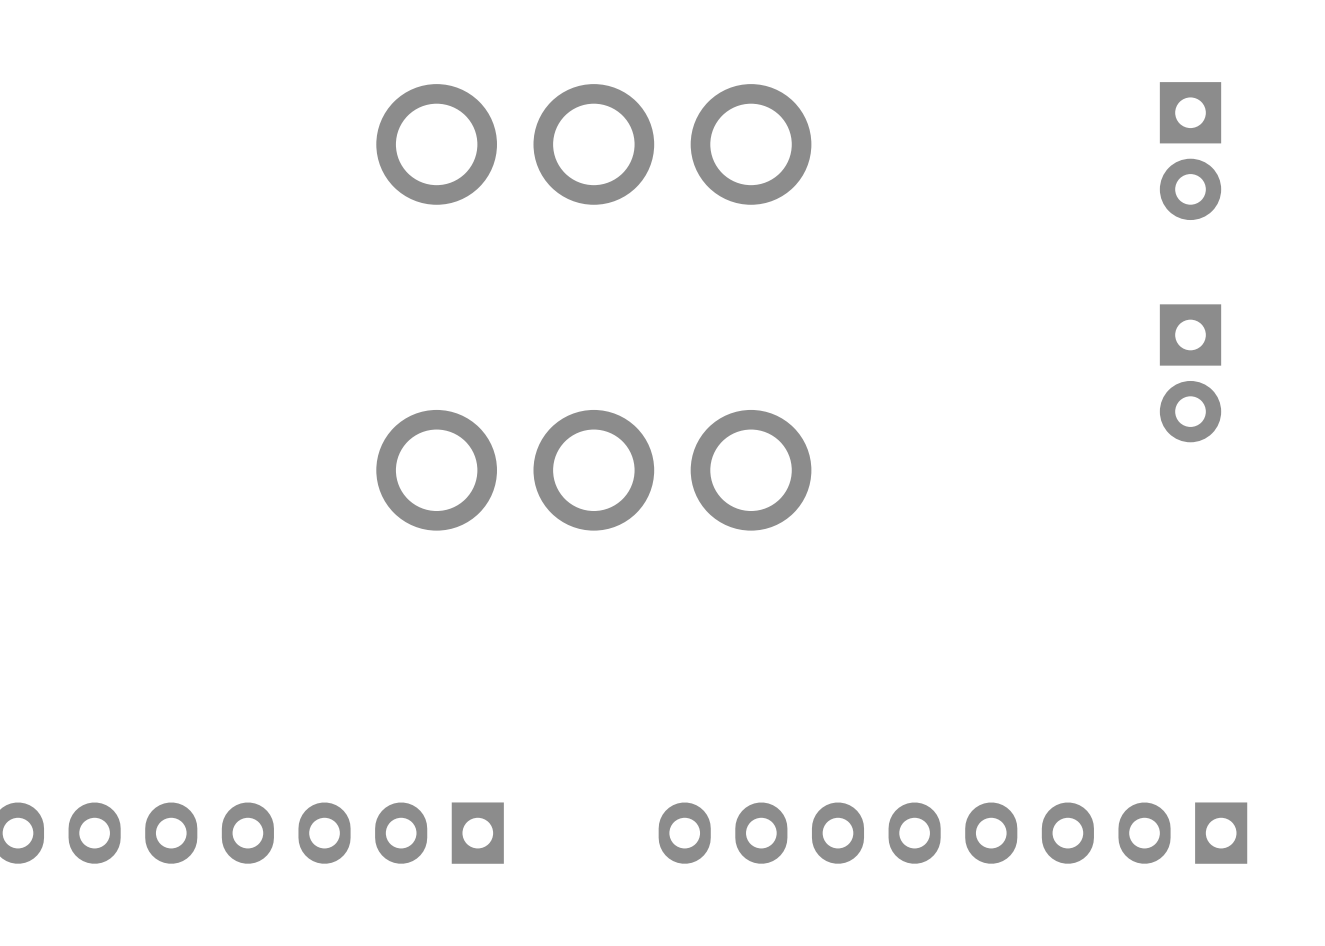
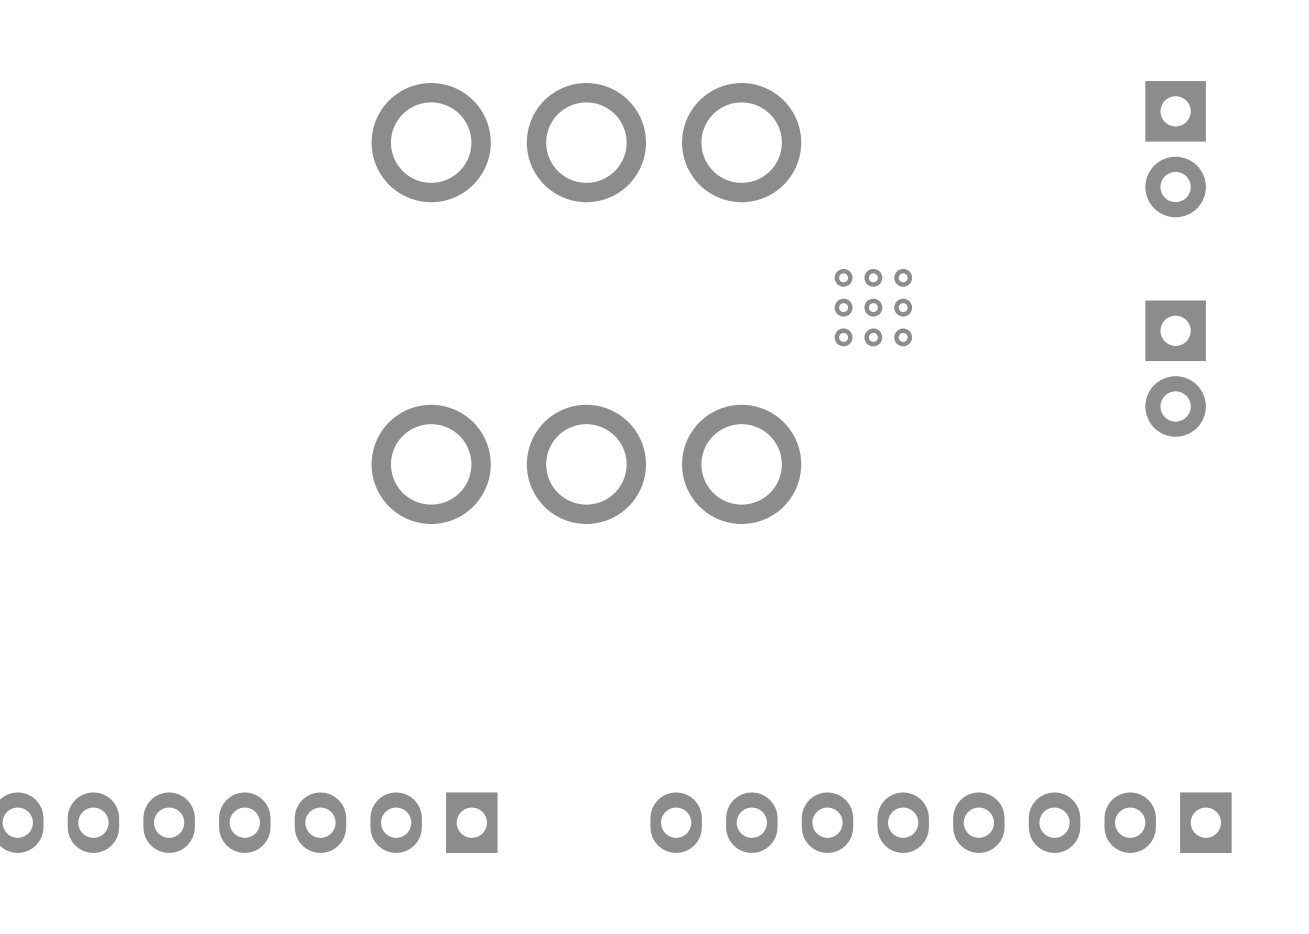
part: none -> (843, 277)
part: none -> (873, 277)
part: none -> (903, 277)
part: none -> (843, 307)
part: none -> (873, 307)
part: none -> (903, 307)
part: none -> (843, 337)
part: none -> (873, 337)
part: none -> (903, 337)

